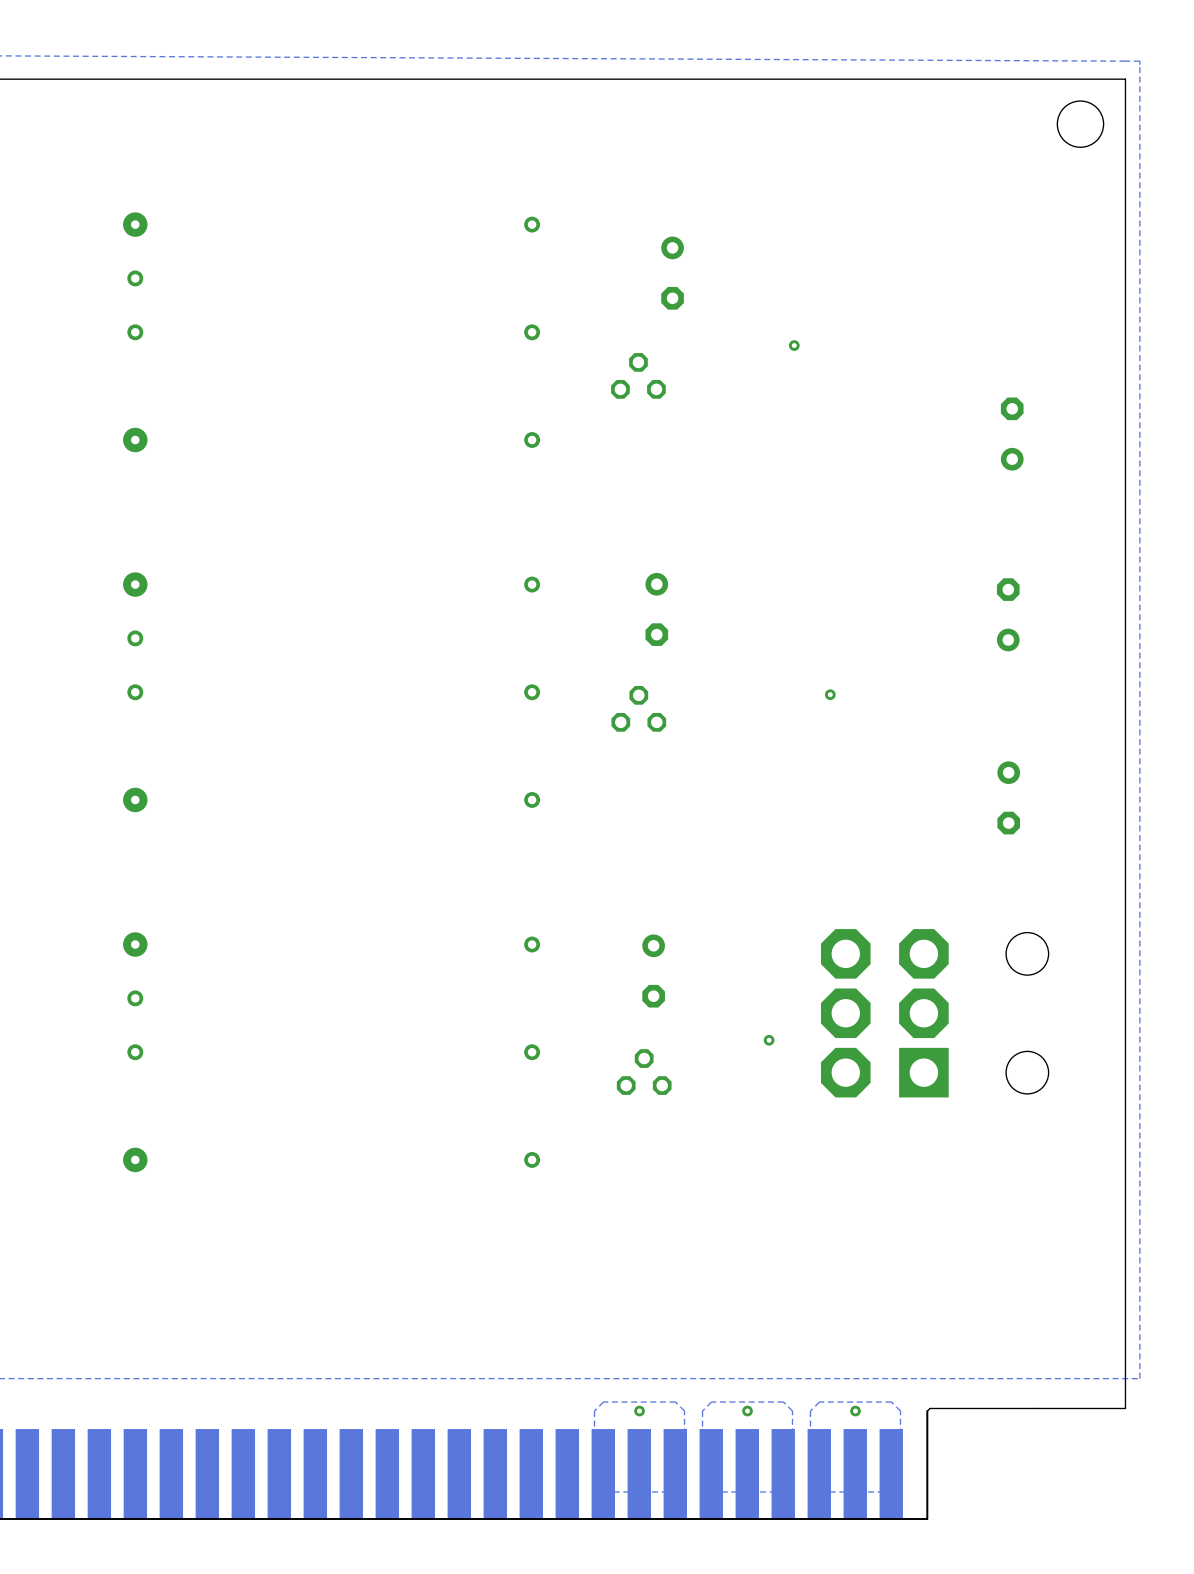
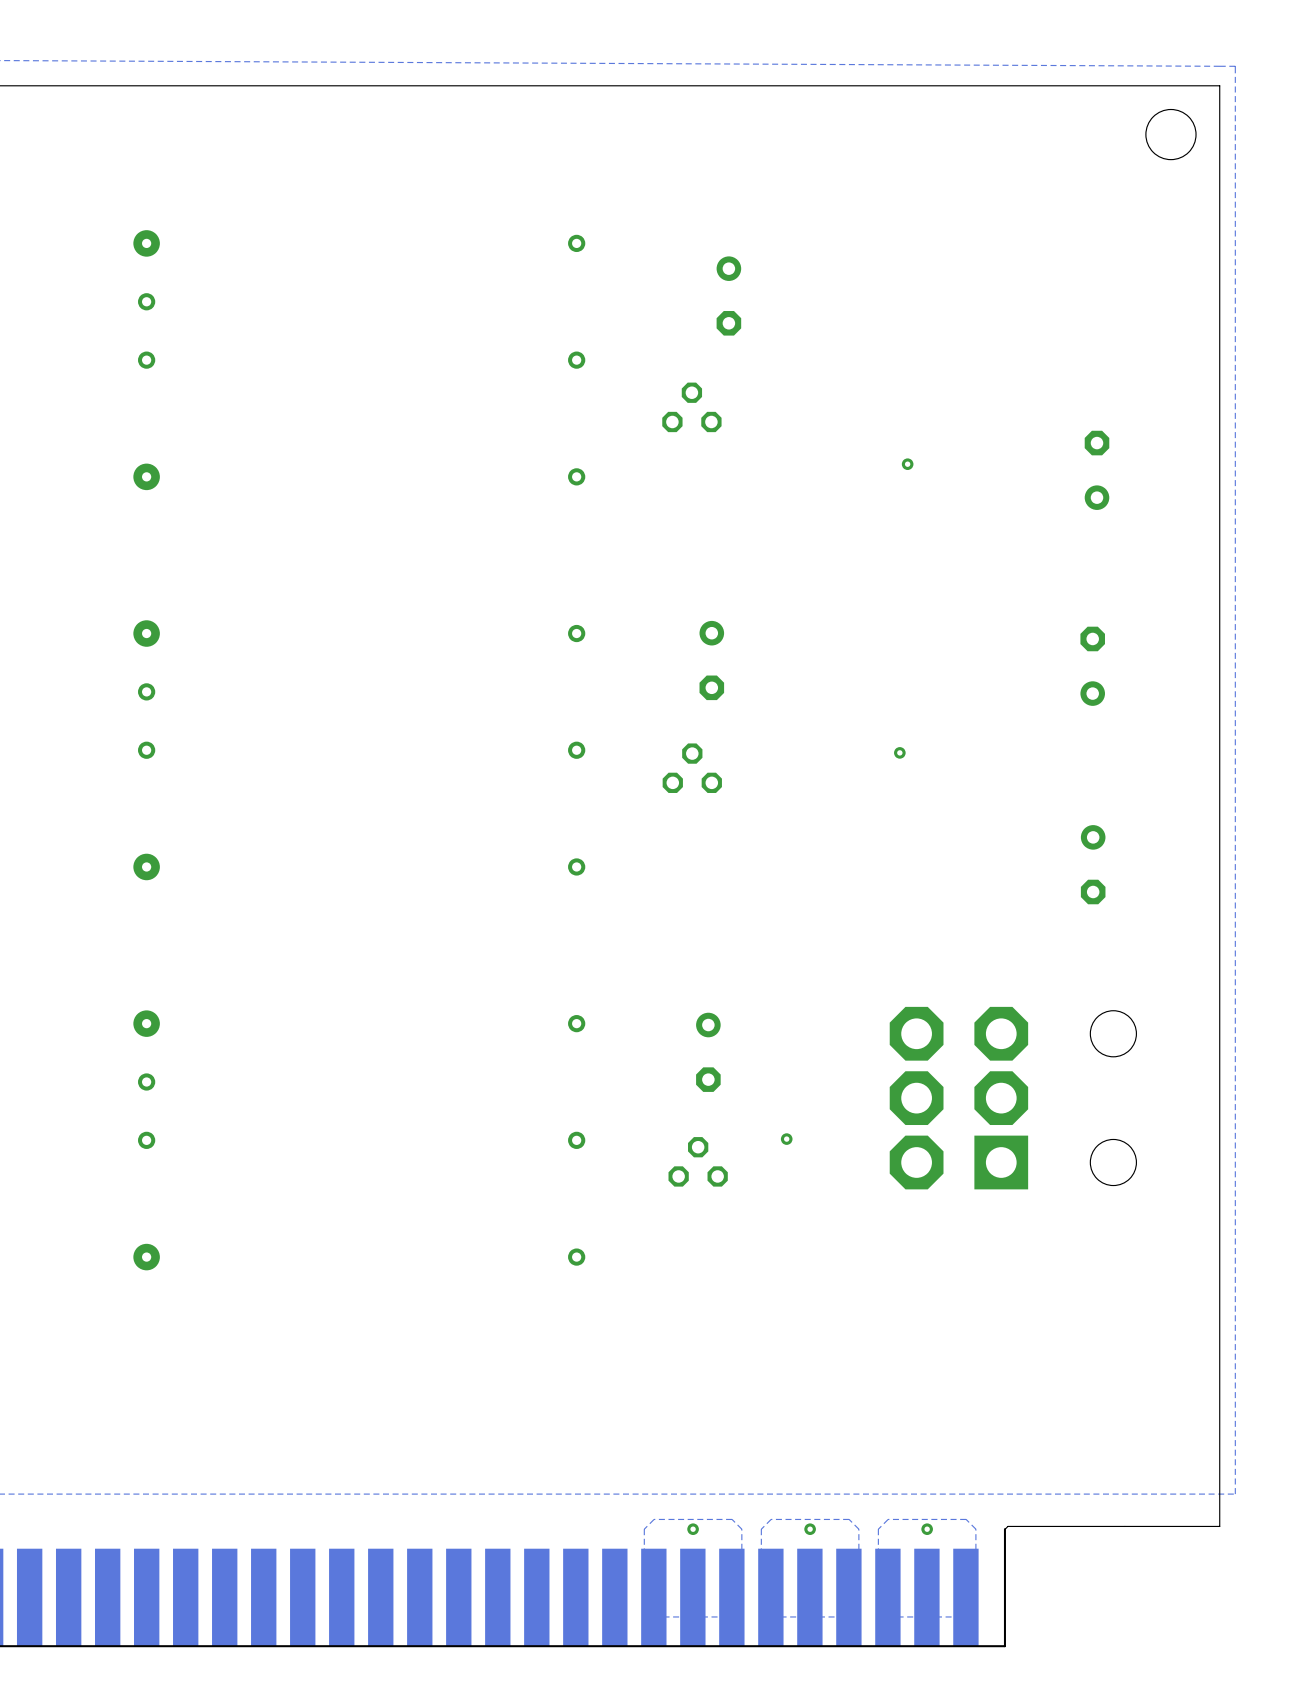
via: (794, 345) -> none
via: none -> (907, 464)
via position: (769, 1040) -> (786, 1139)

